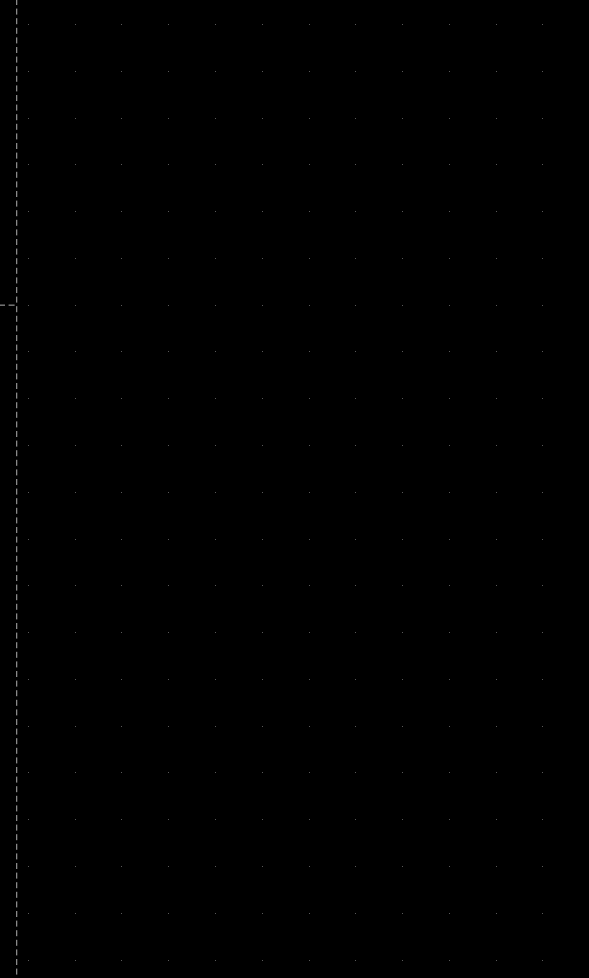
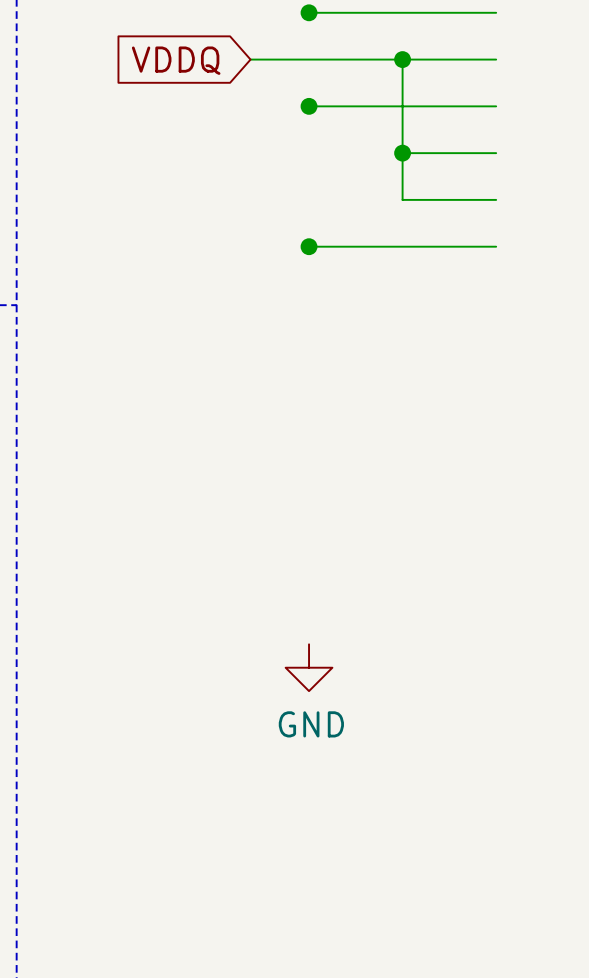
wire: none -> (309, 12) (496, 12)
junction: none -> (309, 12)
wire: none -> (250, 59) (496, 59)
wire: none -> (402, 59) (402, 199) (496, 199)
junction: none -> (402, 59)
global label: none -> VDDQ (176, 60)
wire: none -> (309, 106) (496, 106)
junction: none -> (309, 106)
wire: none -> (402, 153) (496, 153)
junction: none -> (402, 153)
wire: none -> (309, 246) (496, 246)
junction: none -> (309, 246)
power symbol: none -> GND (309, 667)

